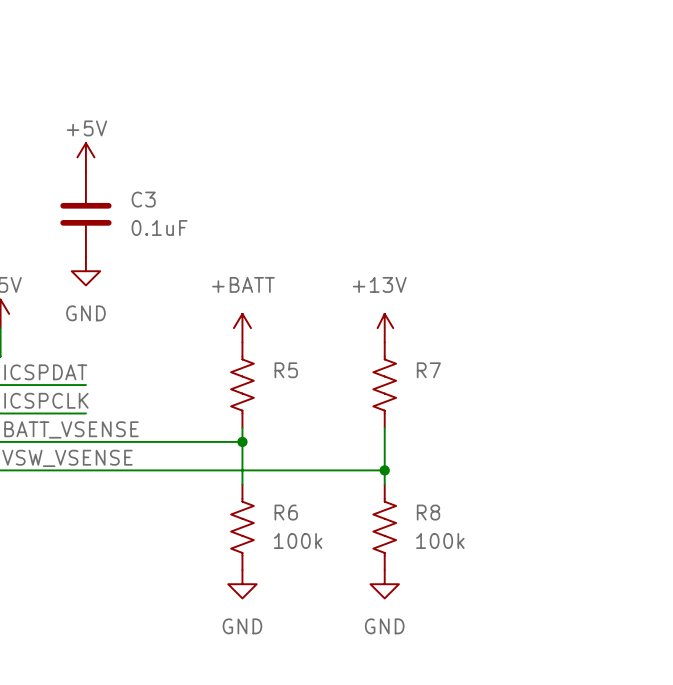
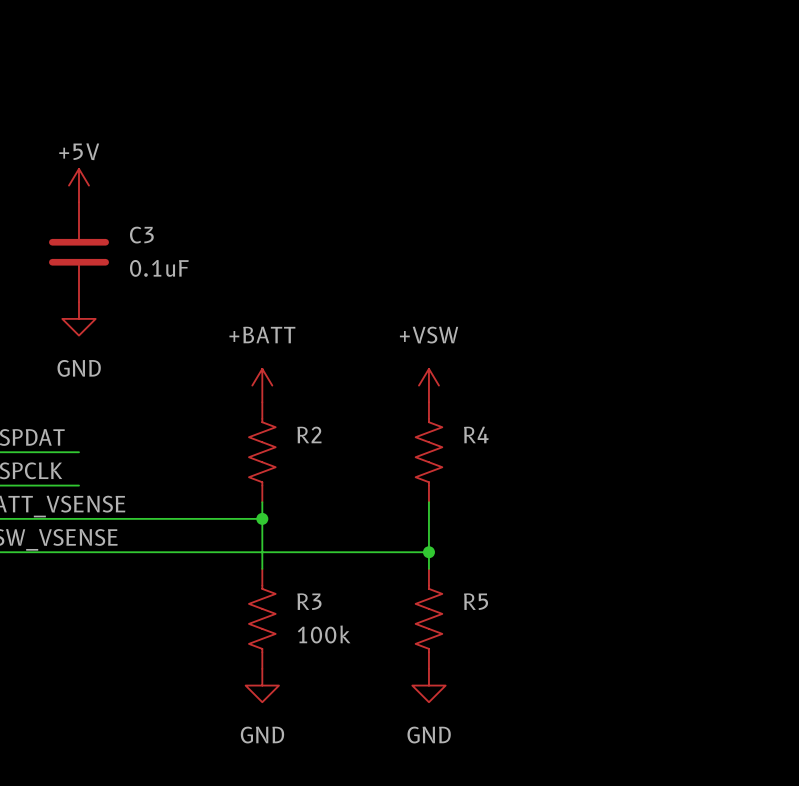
power symbol: +13V (385, 328) -> +VSW (428, 385)
R5 name: R5 (286, 370) -> R2 (309, 434)
R7 name: R7 (428, 370) -> R4 (476, 434)
R6 name: R6 (286, 512) -> R3 (309, 601)
R8 name: R8 (428, 512) -> R5 (476, 601)
R8 value: 100k (440, 541) -> none

